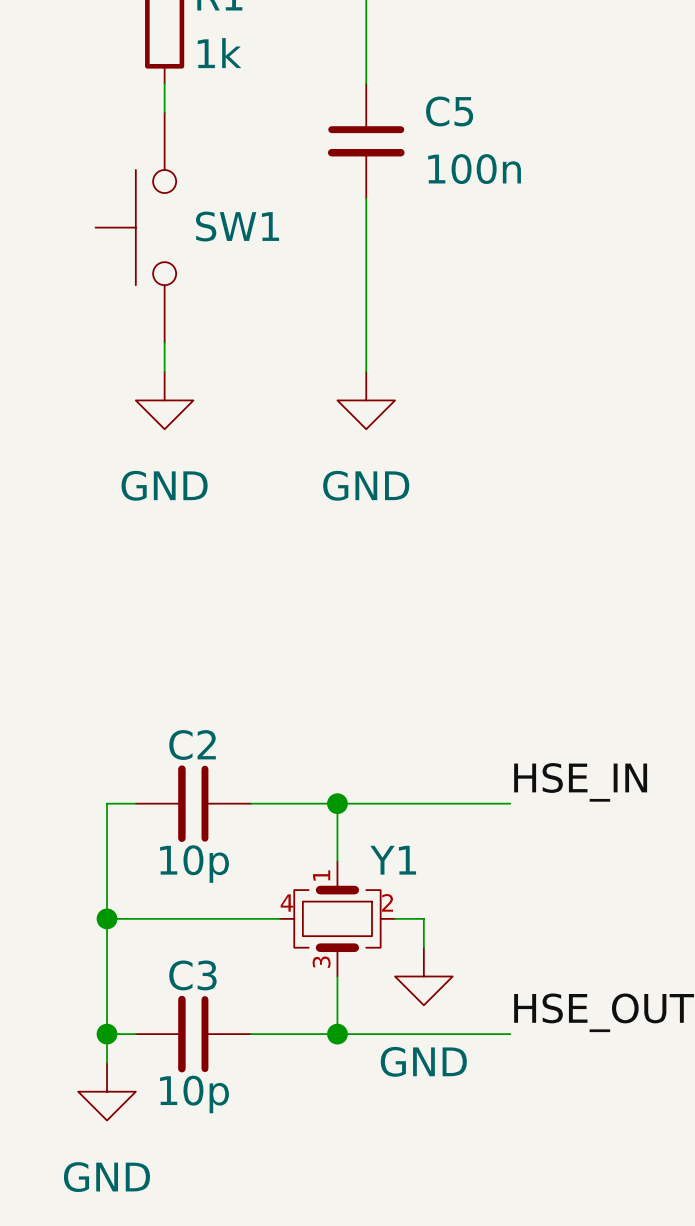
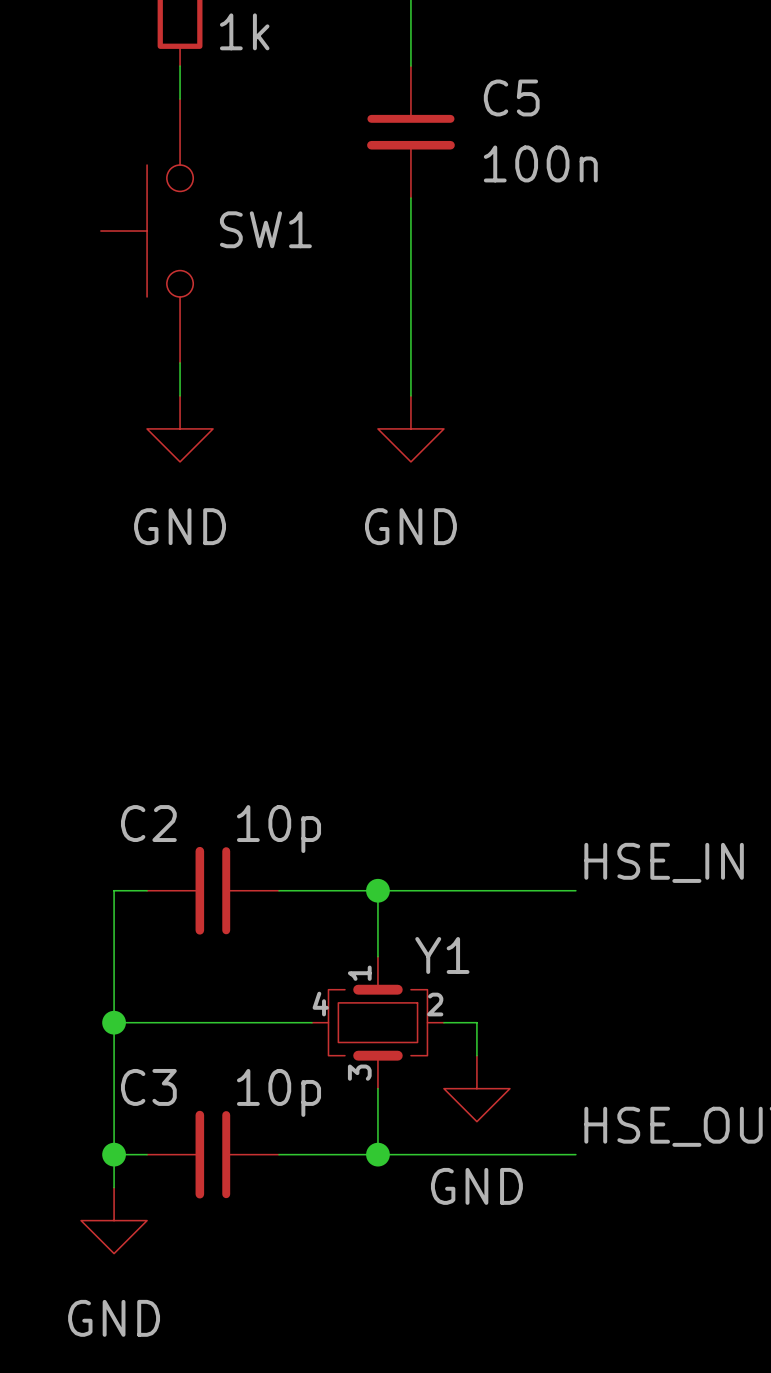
C2 name position: C2 (192, 745) -> C2 (148, 823)
C2 value position: 10p (194, 864) -> 10p (279, 829)
C3 name position: C3 (192, 975) -> C3 (148, 1087)
C3 value position: 10p (194, 1094) -> 10p (279, 1092)

